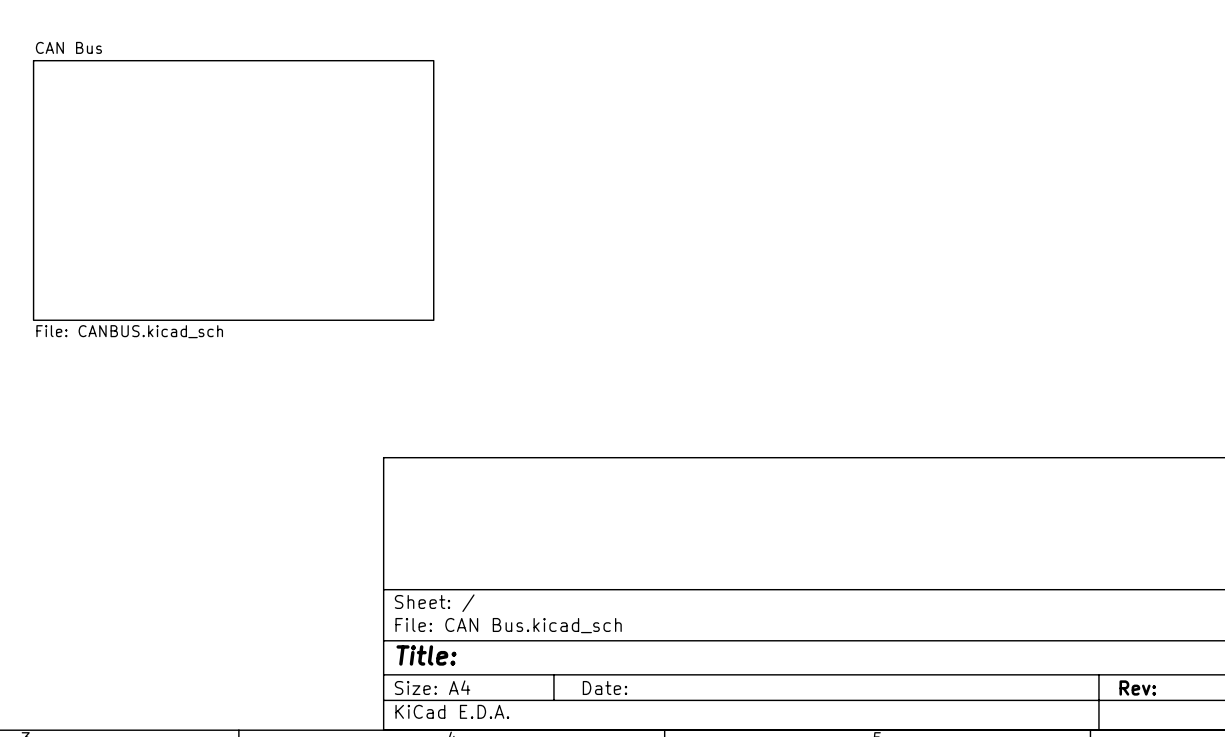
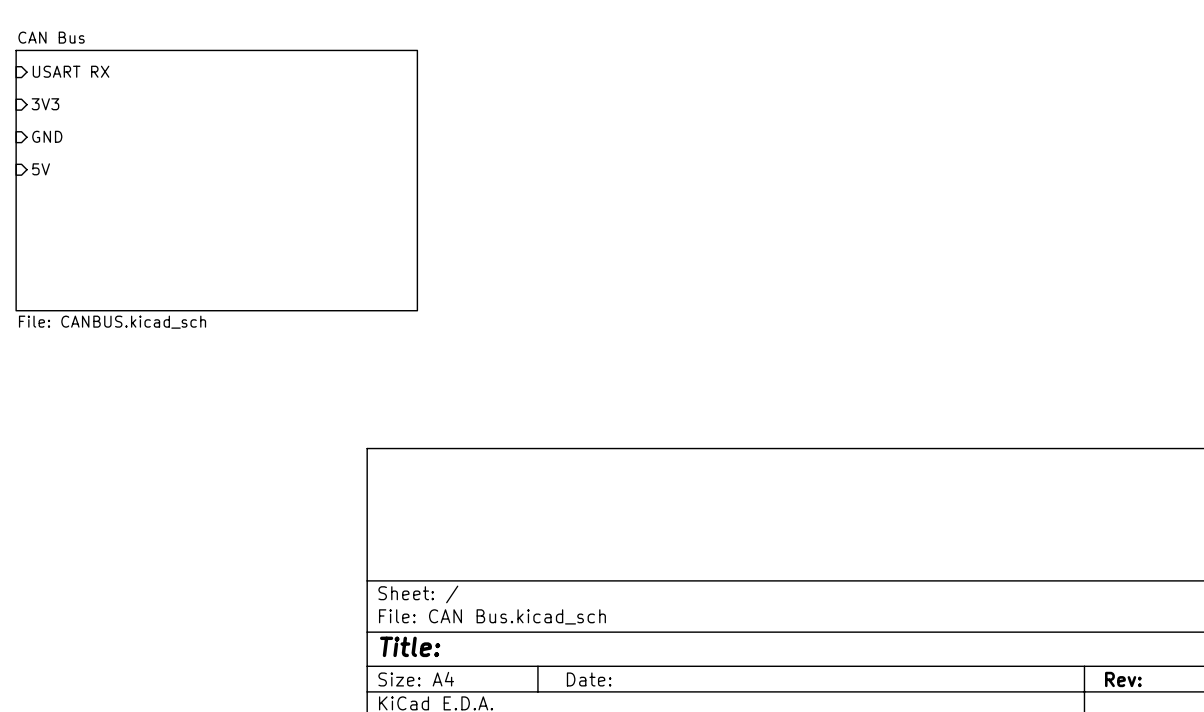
sheet pin: none -> USART RX (71, 71)
sheet pin: none -> 3V3 (45, 104)
sheet pin: none -> GND (47, 136)
sheet pin: none -> 5V (41, 169)

